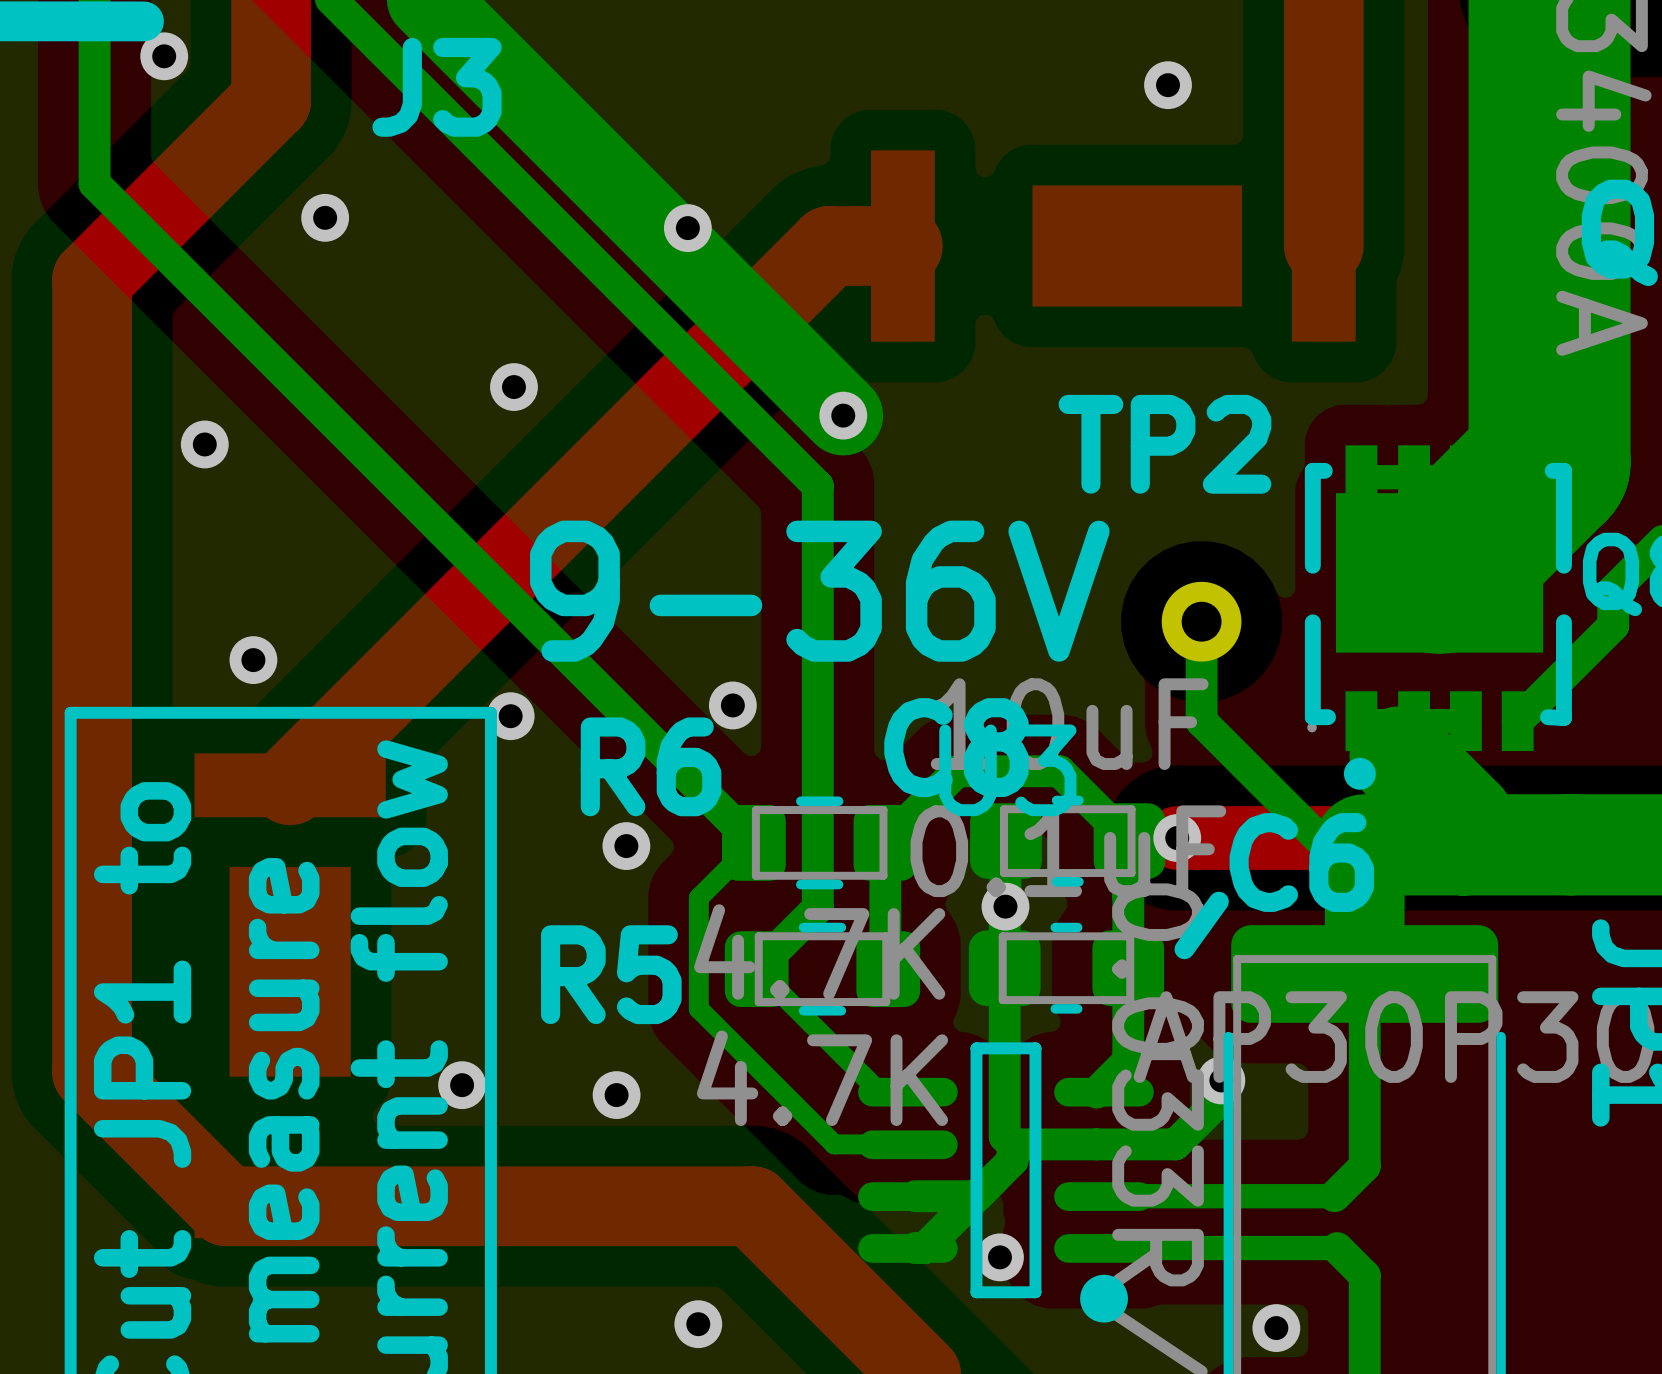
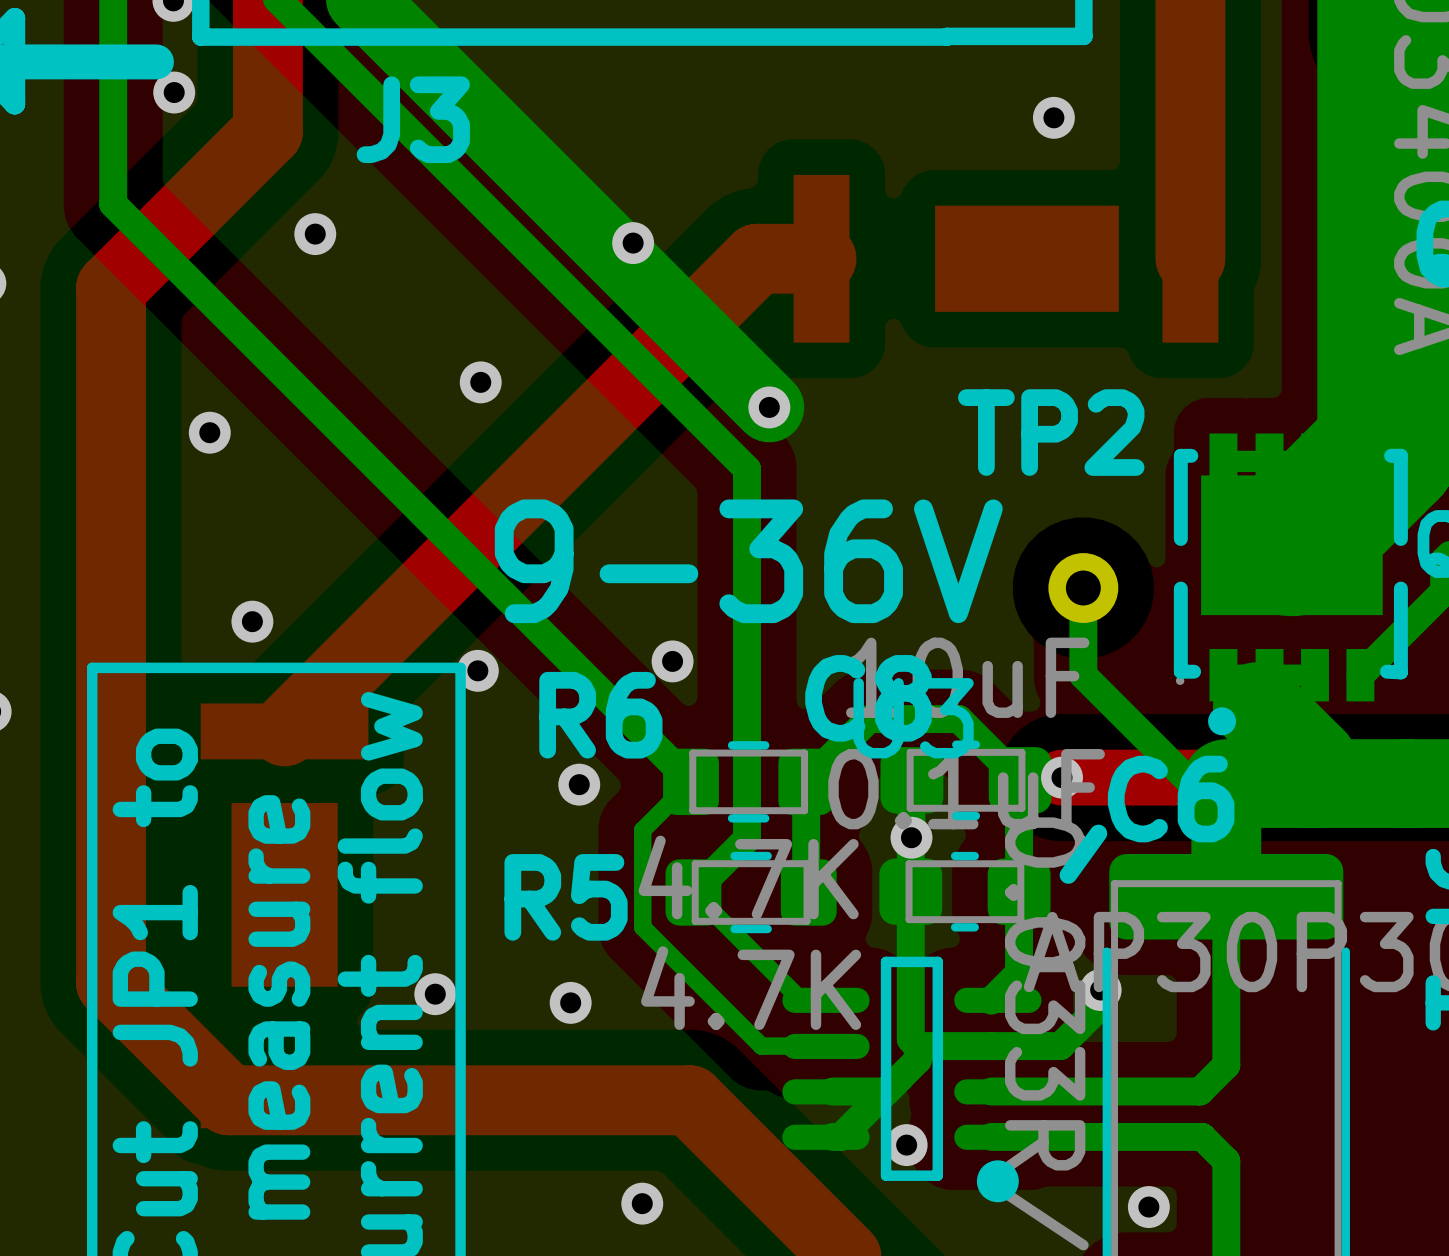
bottom track width: thin (1334, 1196) (1096, 1196) -> thick (1199, 1091) (991, 1091)
bottom track width: thin (1337, 1248) (1096, 1248) -> thick (1202, 1136) (991, 1136)

